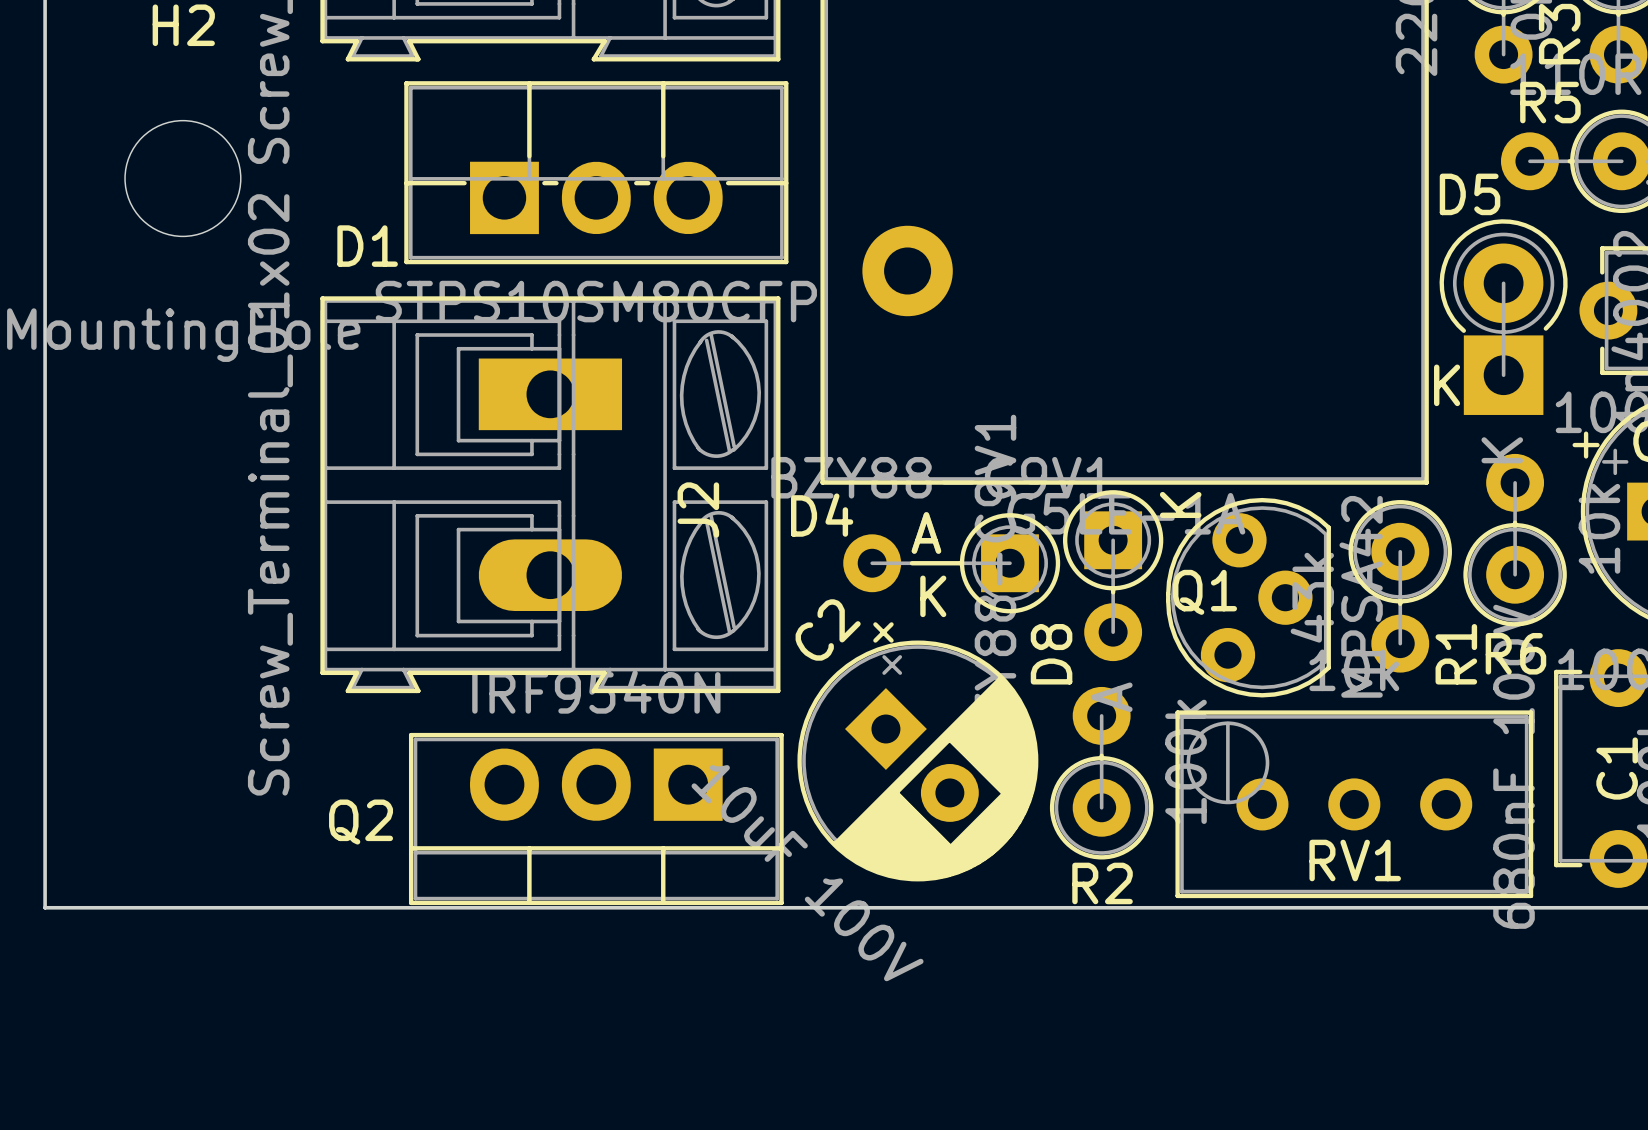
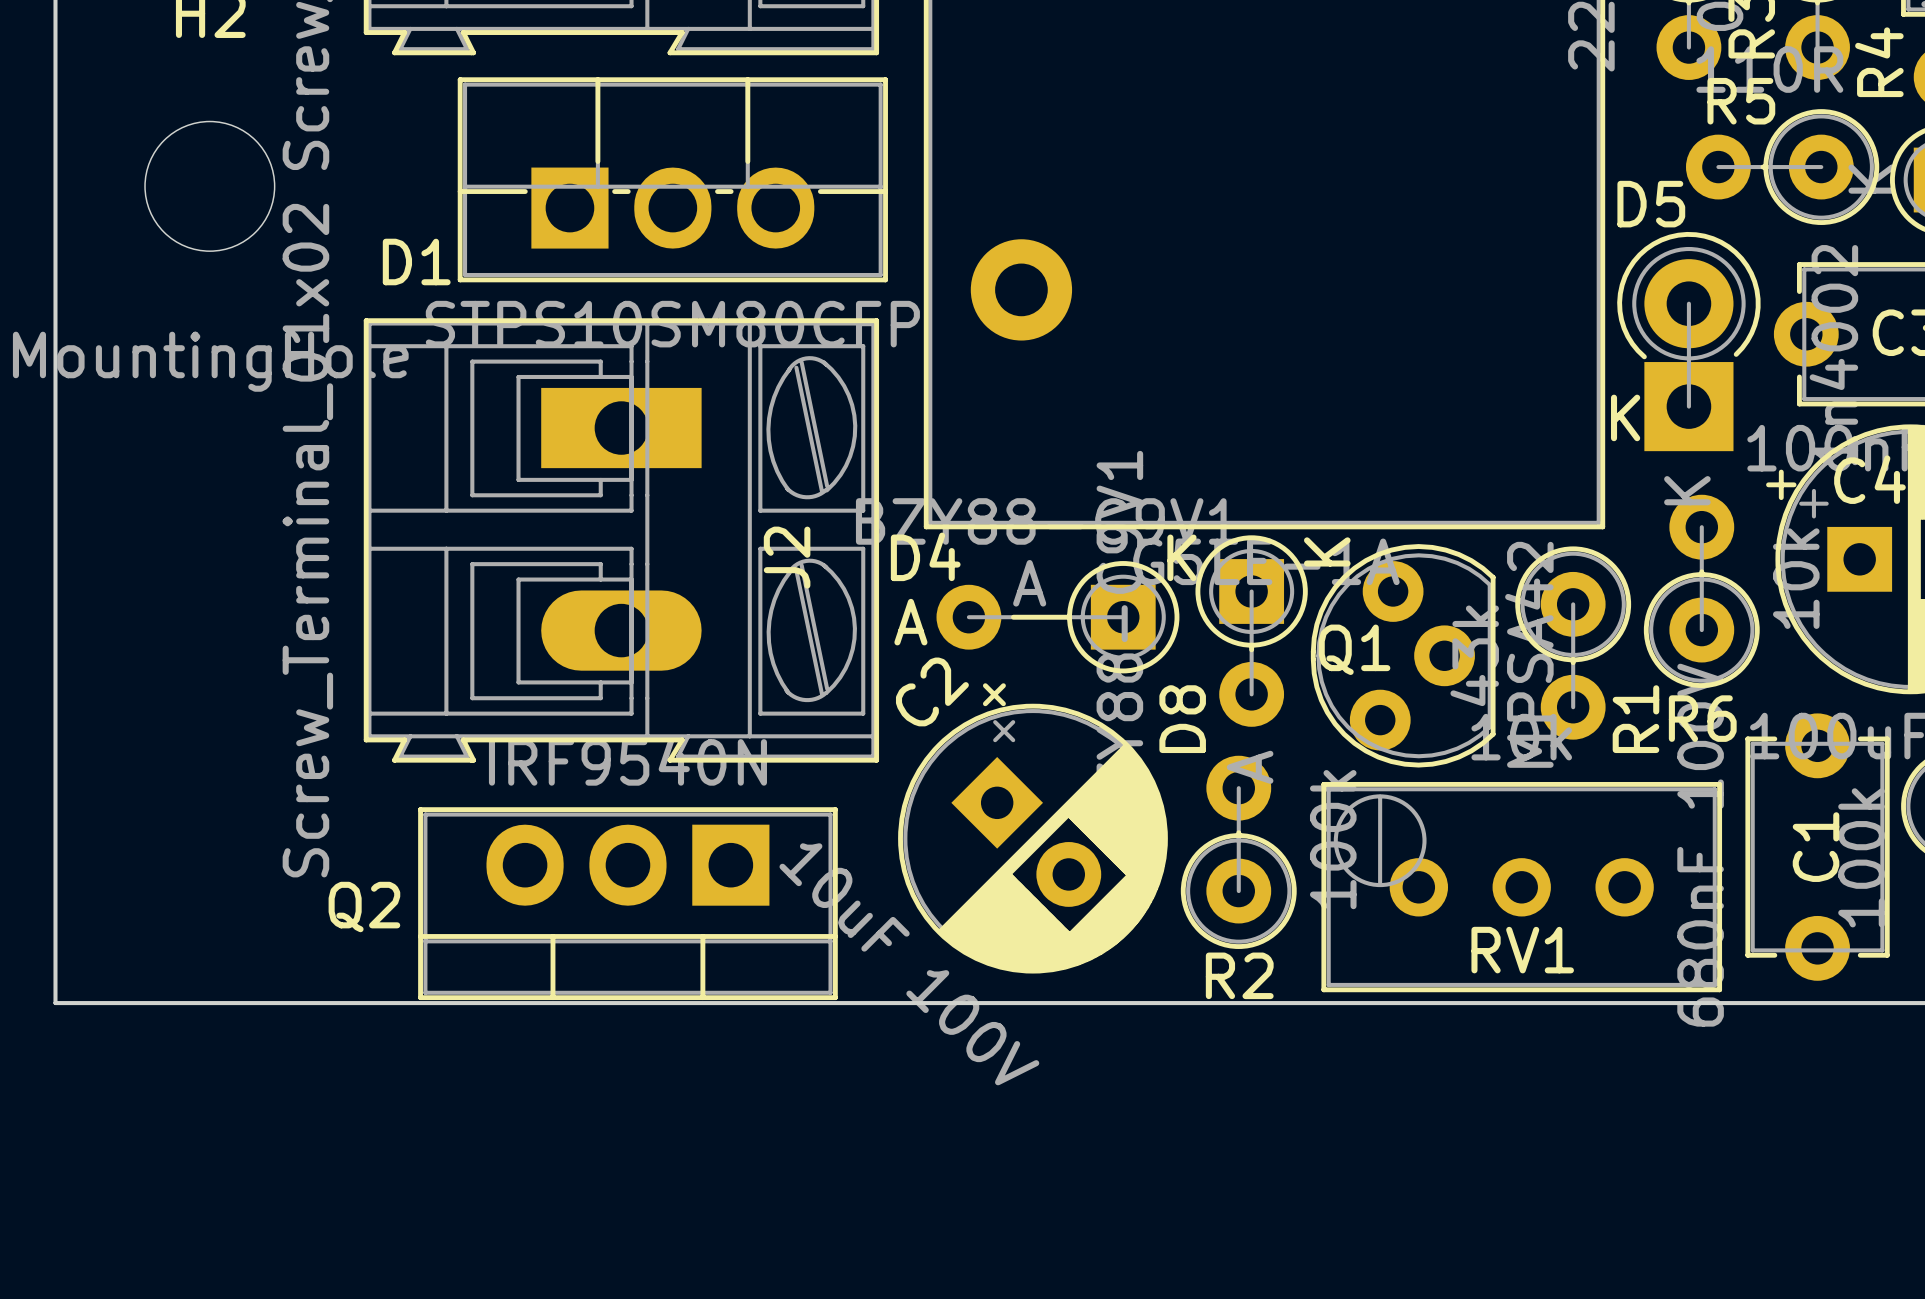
D4 footprint: [843, 513, 1061, 614] -> [936, 561, 1180, 674]
Q2 position: (596, 819) -> (627, 903)

